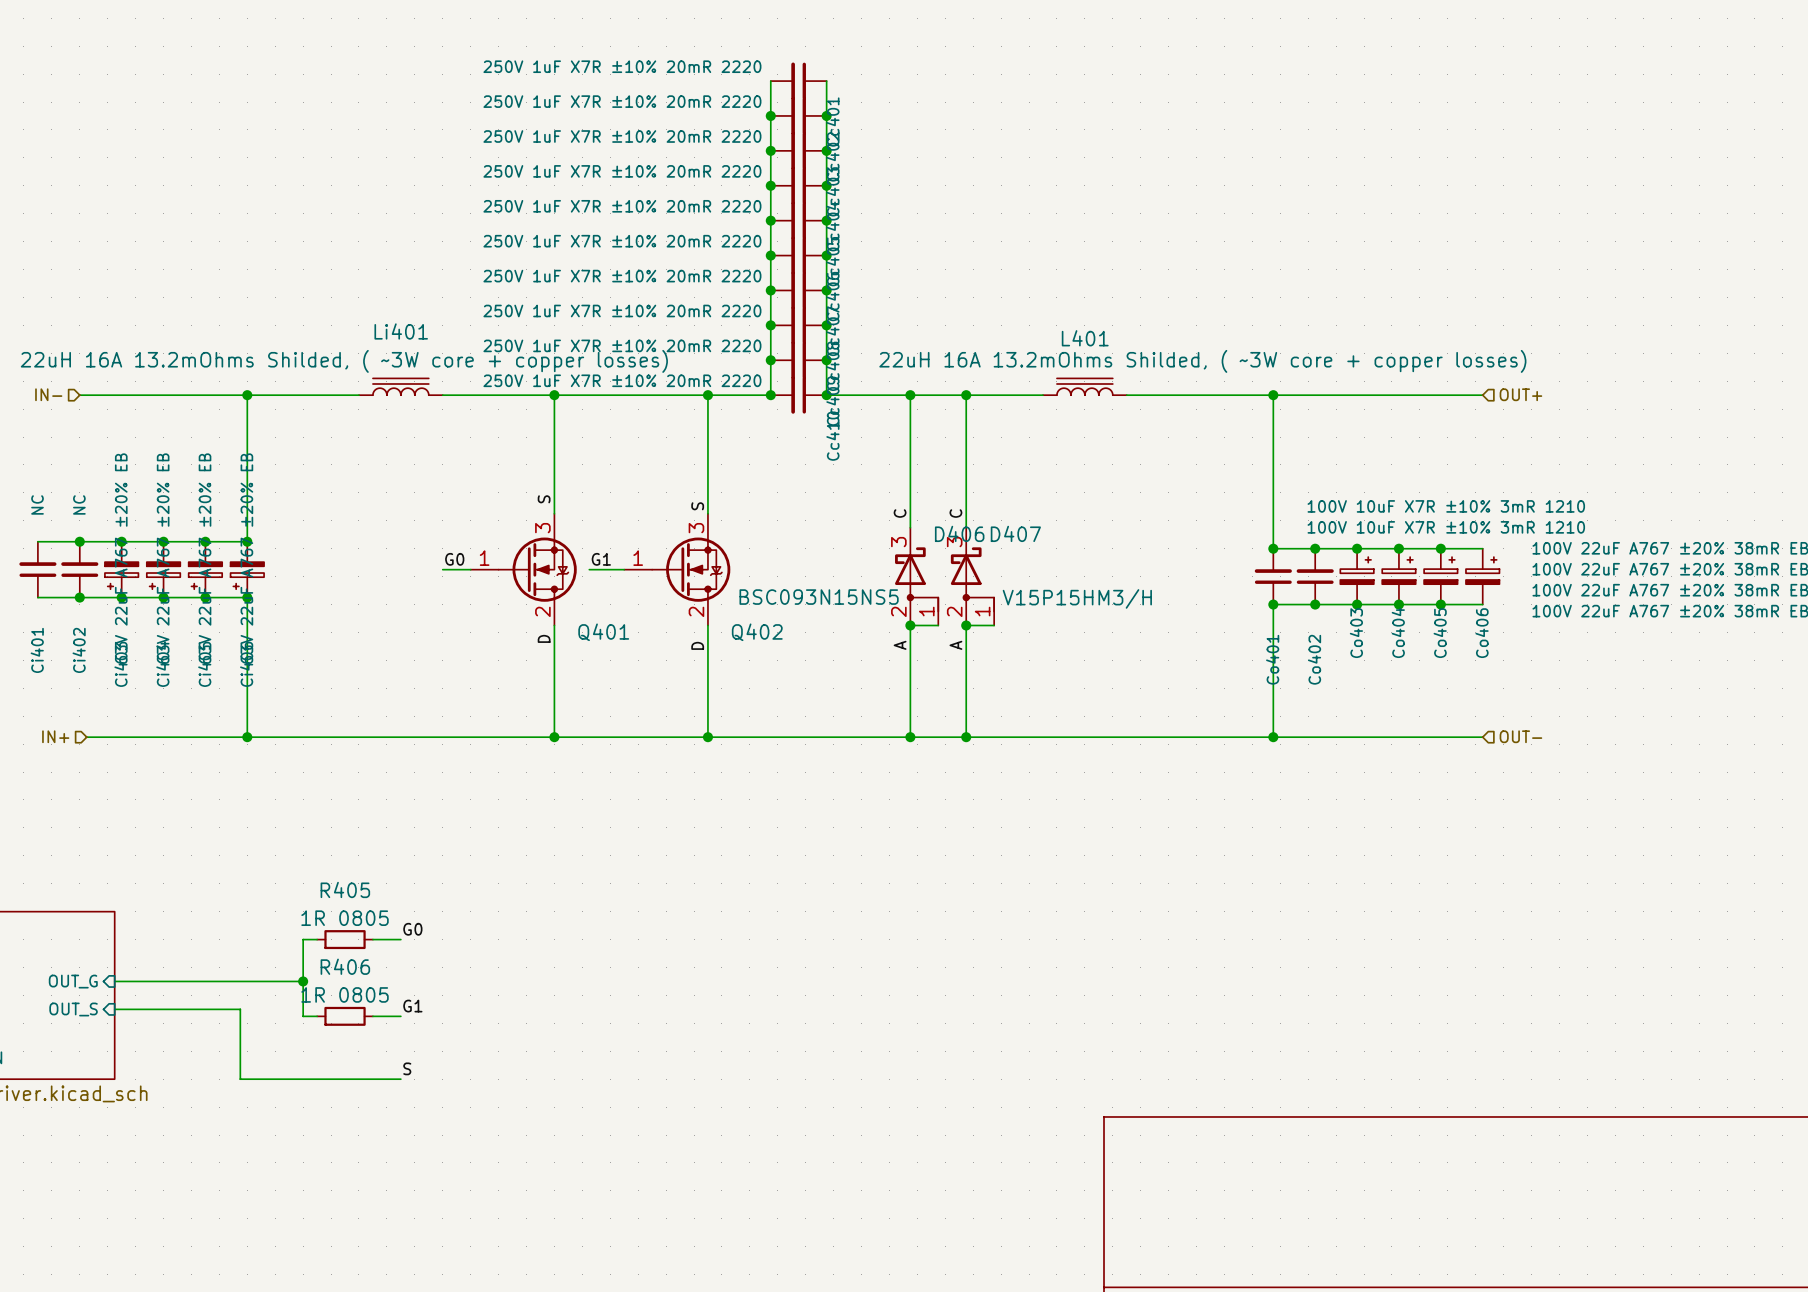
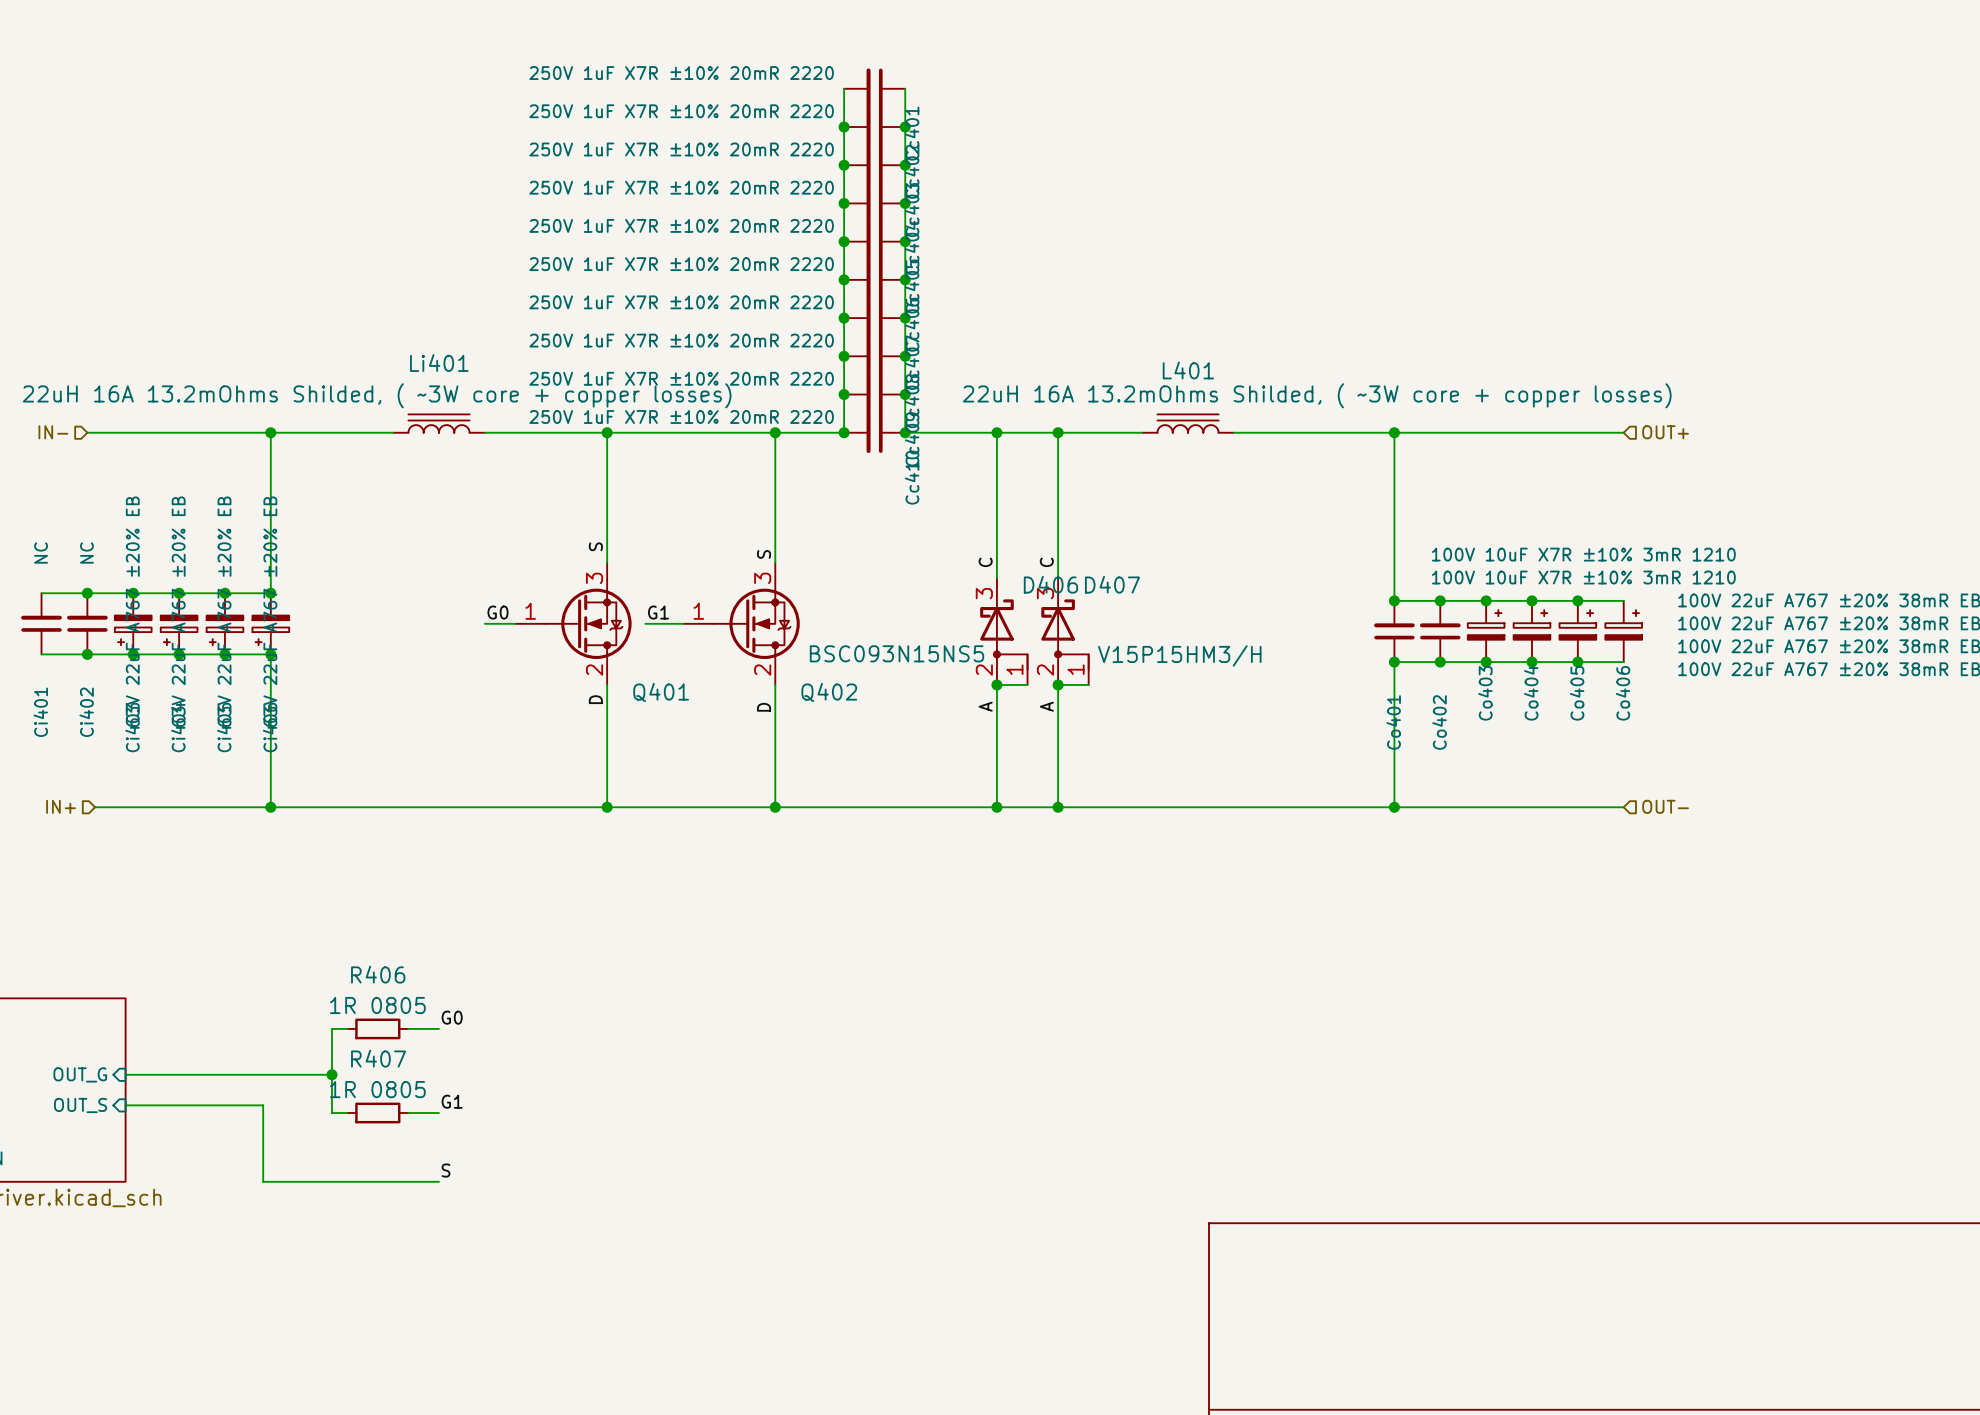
R405 name: R405 (345, 889) -> R406 (378, 974)
R406 name: R406 (345, 966) -> R407 (378, 1058)

